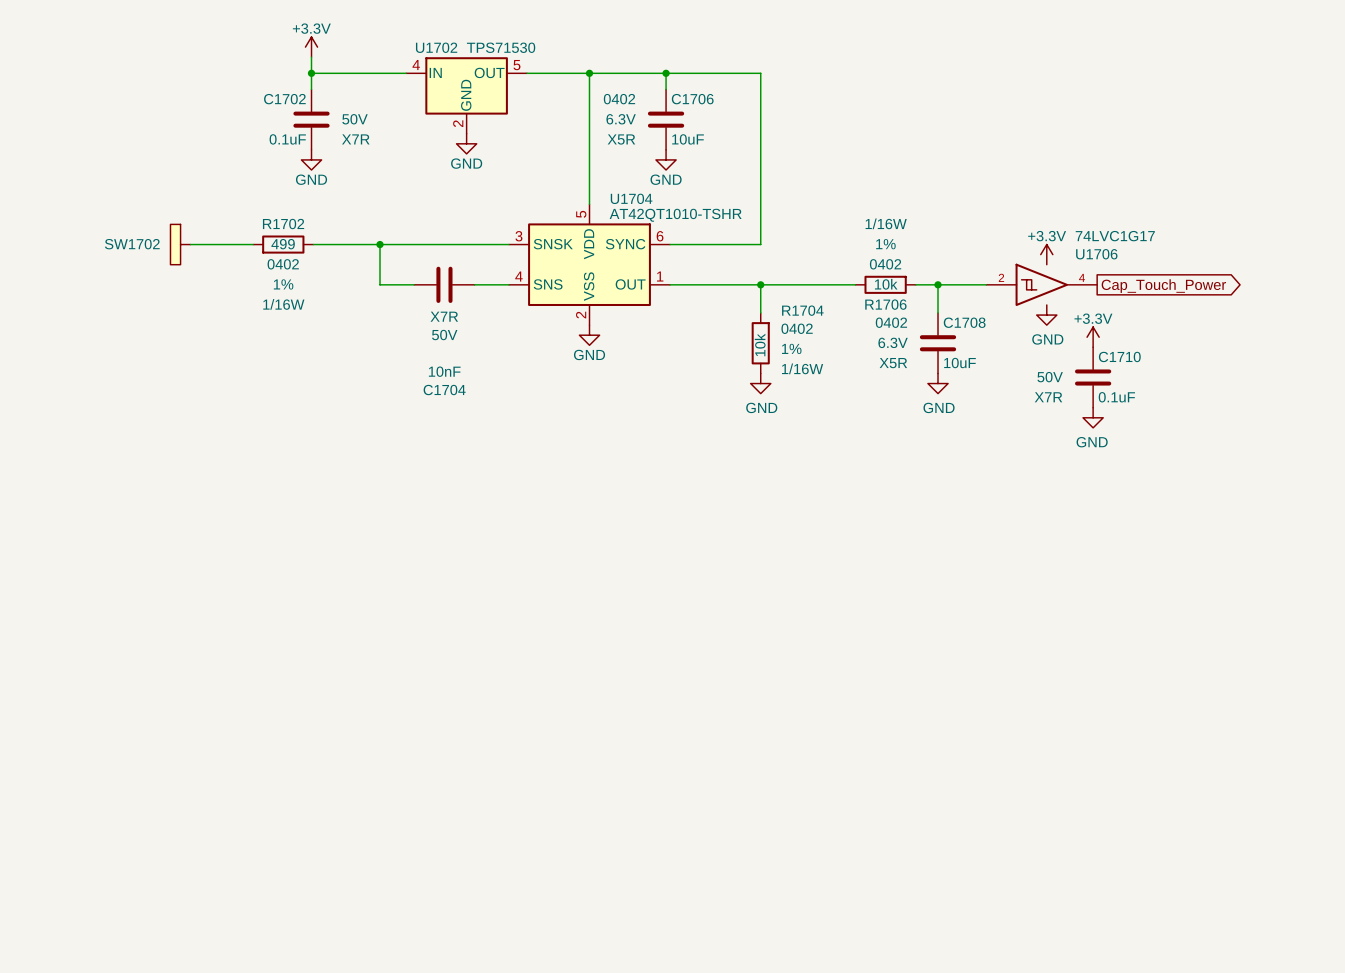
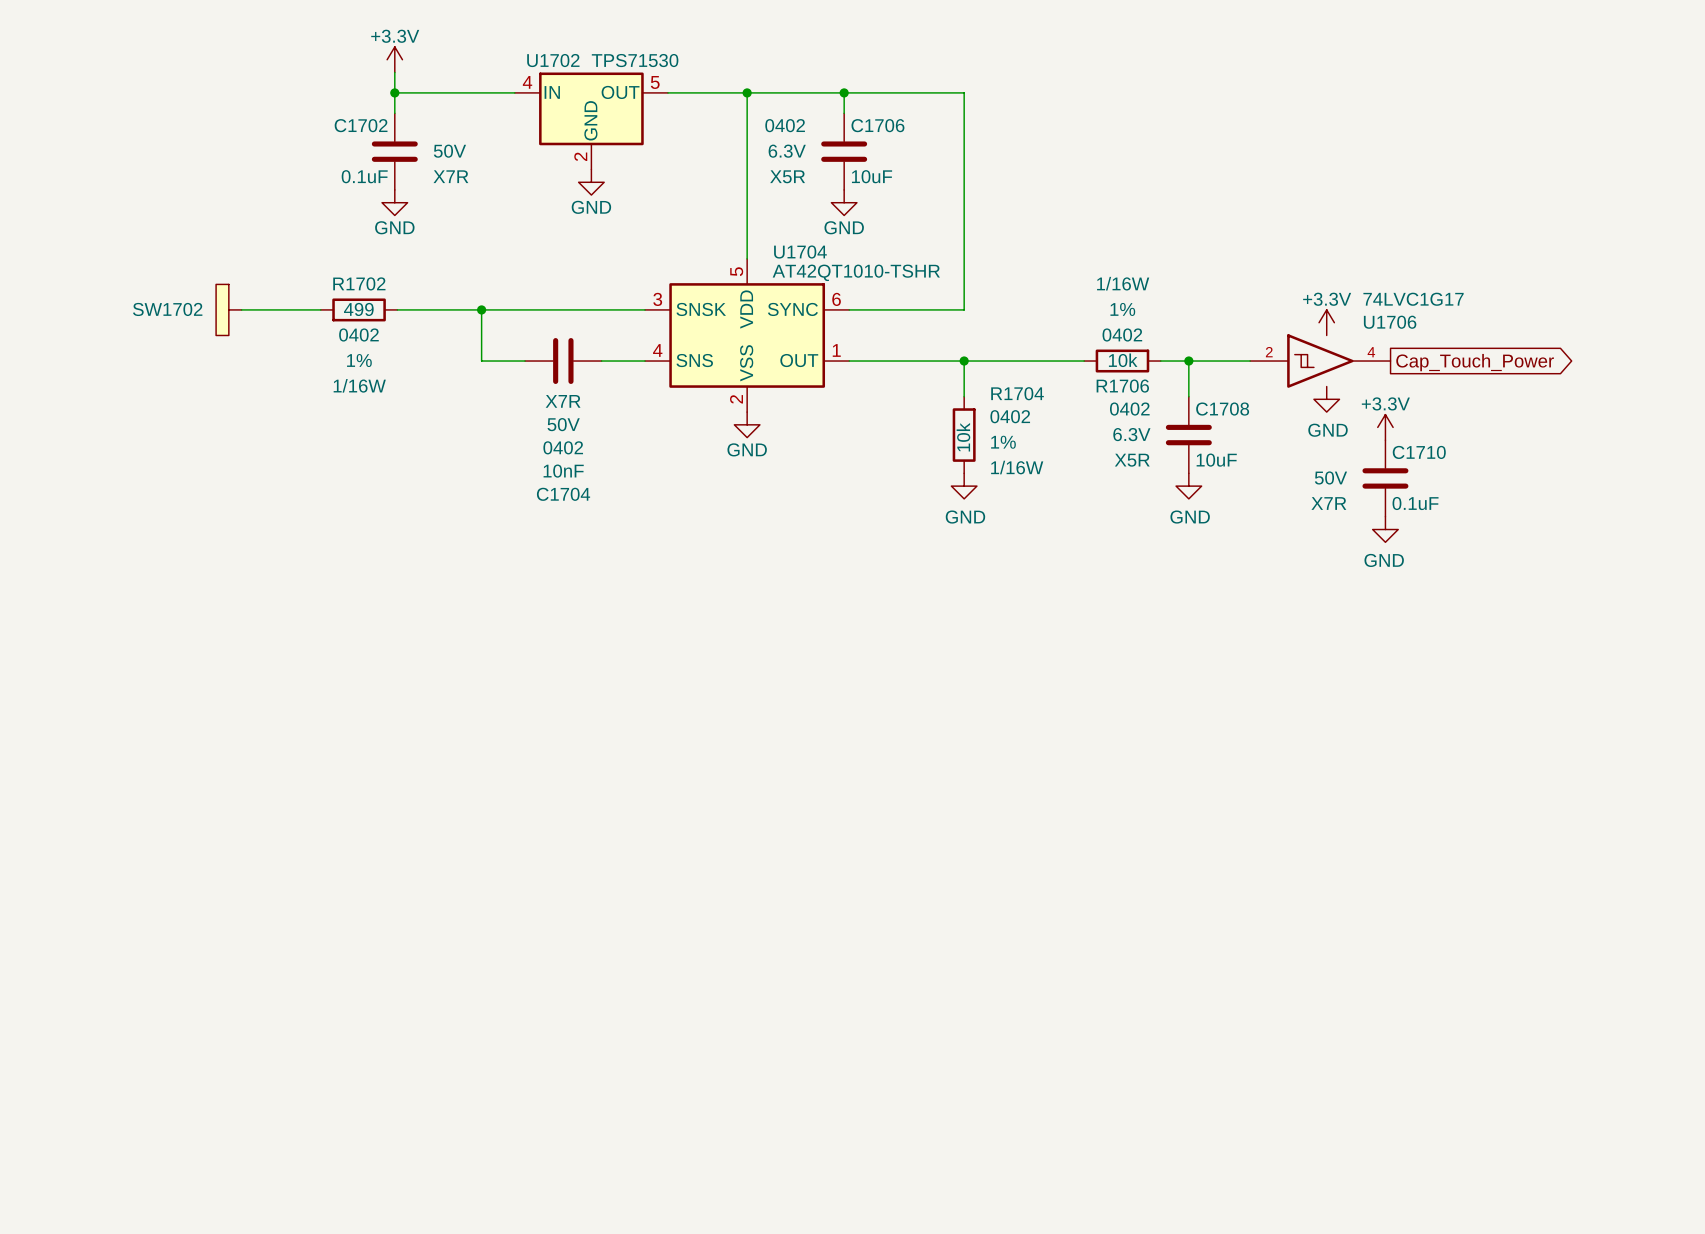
C1704 text: none -> 0402 (563, 447)

